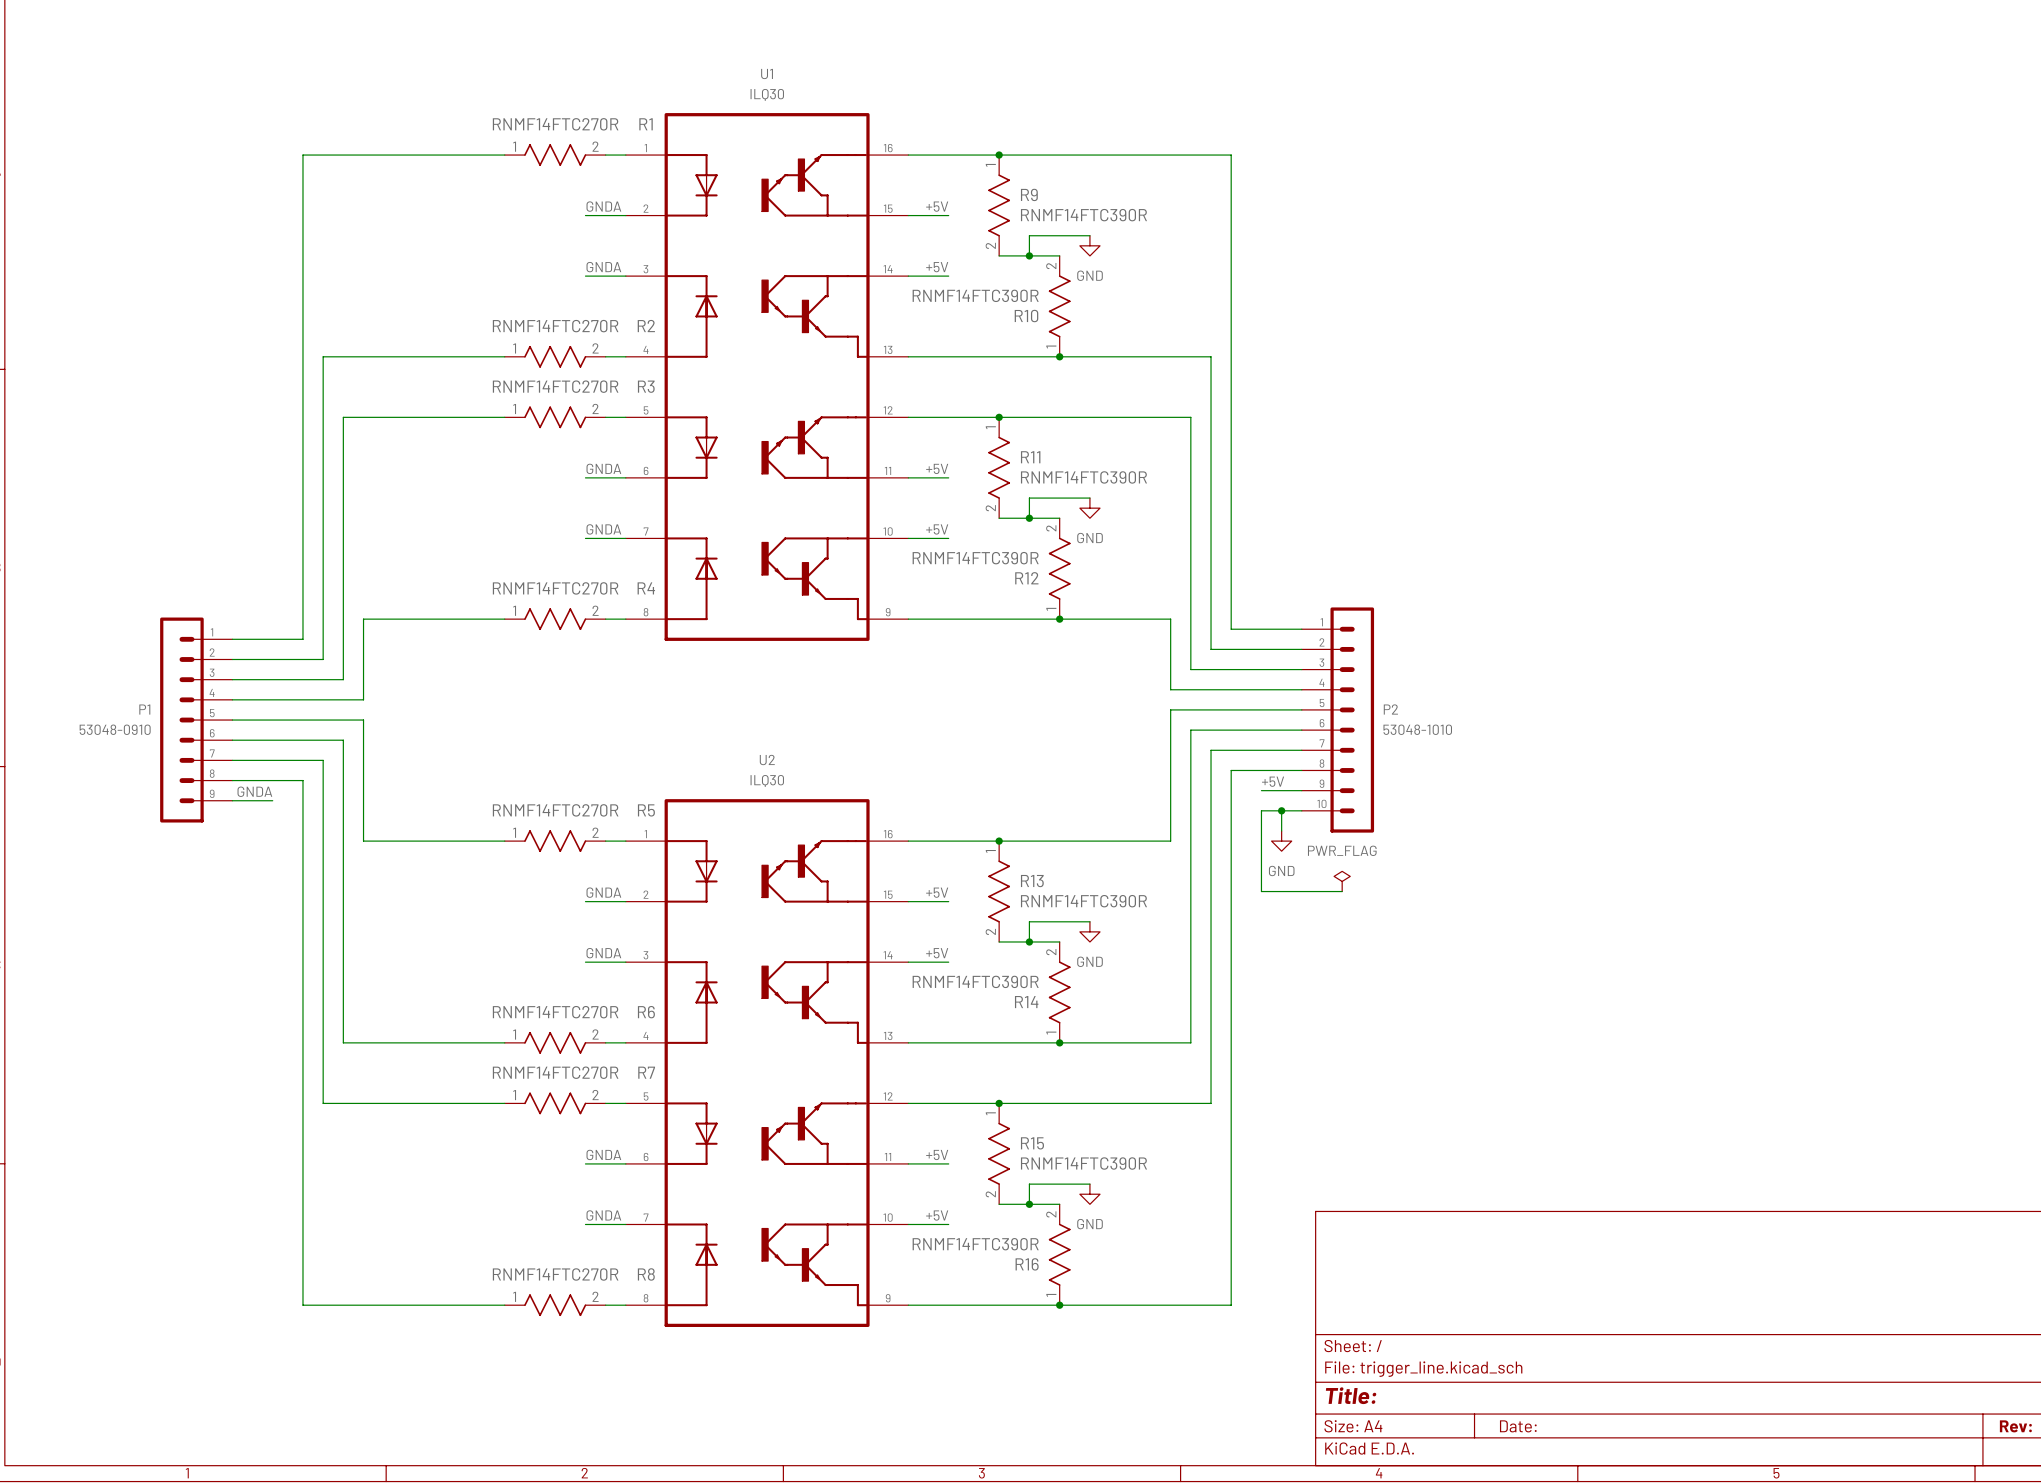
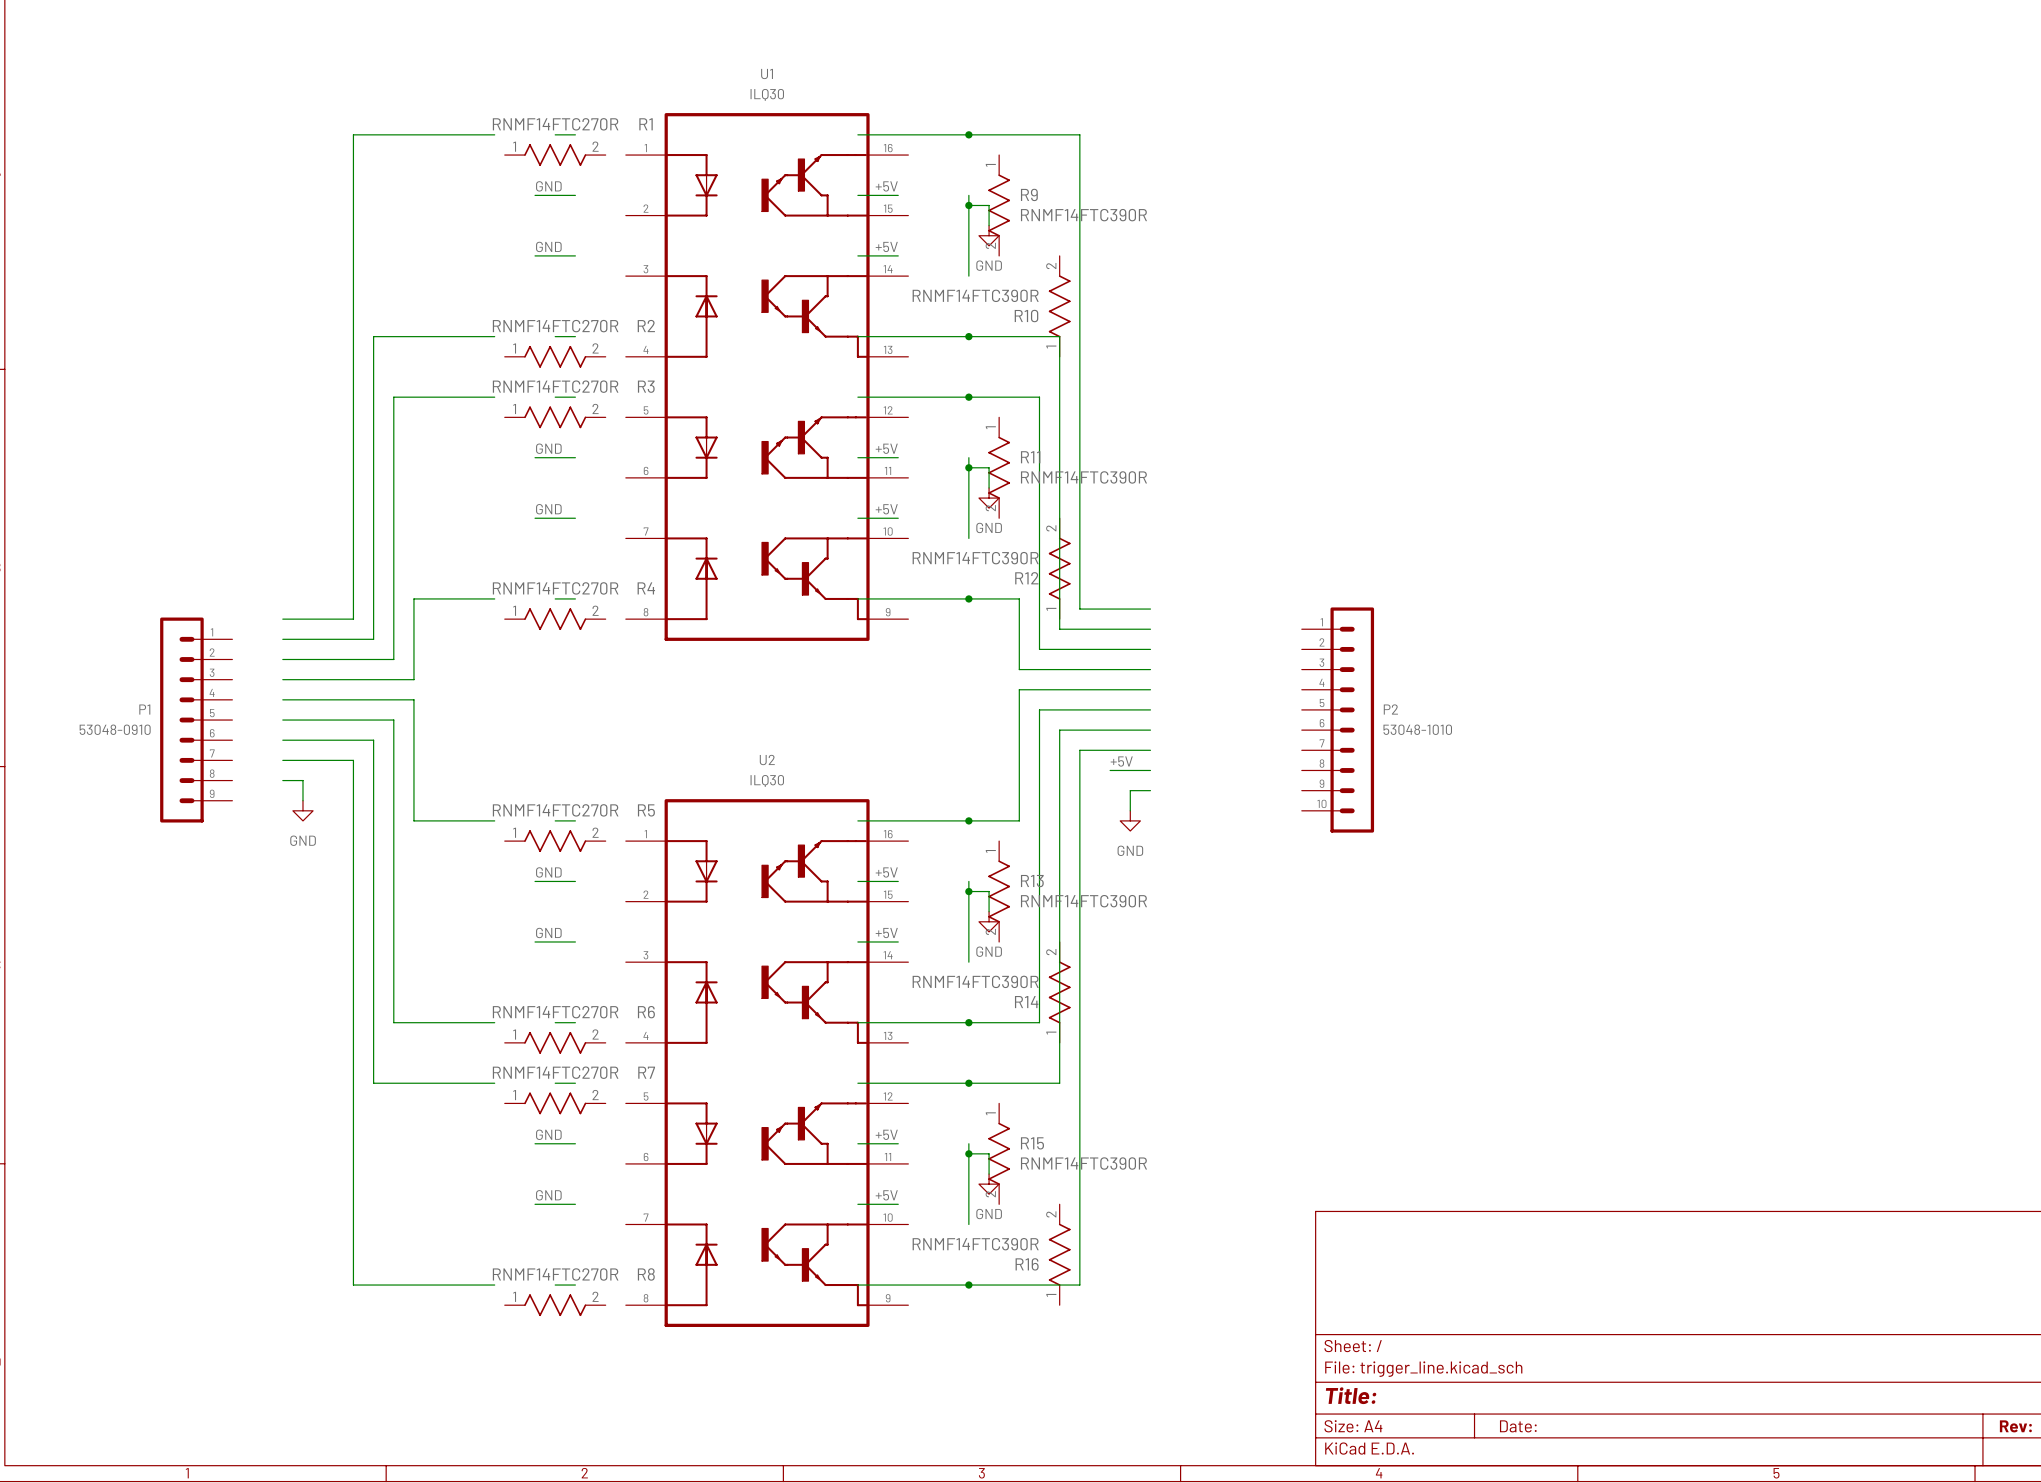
wire: none -> (494, 134) (353, 134) (353, 619) (282, 619)
wire: none -> (857, 134) (1079, 134) (1079, 609) (1150, 609)
junction: none -> (968, 134)
wire: (504, 155) (302, 155) (302, 639) -> (494, 336) (373, 336) (373, 639) (302, 639)
wire: (605, 155) (625, 155) -> (555, 134) (575, 134)
wire: (908, 155) (1231, 155) (1231, 629) (1301, 629) -> none
junction: (999, 155) -> none
label: none -> GND (548, 186)
label: none -> +5V (886, 186)
wire: none -> (968, 195) (968, 276)
wire: none -> (968, 205) (989, 205) (989, 225)
junction: none -> (968, 205)
label: GNDA (603, 206) -> none
label: +5V (937, 206) -> none
wire: (585, 215) (625, 215) -> (535, 195) (575, 195)
wire: (908, 215) (948, 215) -> (857, 195) (898, 195)
wire: (1089, 235) (1029, 235) (1029, 255) -> none
power symbol position: GND (1089, 245) -> GND (989, 235)
label: none -> GND (548, 246)
label: none -> +5V (886, 246)
wire: (999, 255) (1059, 255) -> none
junction: (1029, 255) -> none
label: GNDA (603, 267) -> none
label: +5V (937, 267) -> none
wire: (585, 276) (625, 276) -> (535, 255) (575, 255)
wire: (908, 276) (948, 276) -> (857, 255) (898, 255)
wire: none -> (857, 336) (1059, 336) (1059, 629) (1150, 629)
junction: none -> (968, 336)
wire: (504, 356) (323, 356) (323, 659) -> (494, 397) (393, 397) (393, 659) (323, 659)
wire: (605, 356) (625, 356) -> (555, 336) (575, 336)
wire: (908, 356) (1211, 356) (1211, 649) (1301, 649) -> none
junction: (1059, 356) -> none
wire: none -> (857, 397) (1039, 397) (1039, 649) (1150, 649)
junction: none -> (968, 397)
wire: (504, 417) (343, 417) (343, 679) -> (494, 598) (413, 598) (413, 679) (343, 679)
wire: (605, 417) (625, 417) -> (555, 397) (575, 397)
wire: (908, 417) (1190, 417) (1190, 669) (1301, 669) -> none
junction: (999, 417) -> none
label: none -> GND (548, 448)
label: none -> +5V (886, 448)
wire: none -> (968, 457) (968, 538)
wire: none -> (968, 467) (989, 467) (989, 487)
junction: none -> (968, 467)
label: GNDA (603, 468) -> none
label: +5V (937, 468) -> none
wire: (585, 477) (625, 477) -> (535, 457) (575, 457)
wire: (908, 477) (948, 477) -> (857, 457) (898, 457)
wire: (1089, 498) (1029, 498) (1029, 518) -> none
power symbol position: GND (1089, 508) -> GND (989, 498)
label: none -> GND (548, 509)
label: none -> +5V (886, 509)
wire: (999, 518) (1059, 518) -> none
junction: (1029, 518) -> none
label: GNDA (603, 529) -> none
label: +5V (937, 529) -> none
wire: (585, 538) (625, 538) -> (535, 518) (575, 518)
wire: (908, 538) (948, 538) -> (857, 518) (898, 518)
wire: none -> (857, 598) (1019, 598) (1019, 669) (1150, 669)
junction: none -> (968, 598)
wire: (504, 619) (363, 619) (363, 699) -> (494, 820) (413, 820) (413, 699) (363, 699)
wire: (605, 619) (625, 619) -> (555, 598) (575, 598)
wire: (908, 619) (1170, 619) (1170, 689) (1301, 689) -> none
junction: (1059, 619) -> none
wire: (232, 639) (282, 639) -> none
wire: (232, 659) (282, 659) -> none
wire: (232, 679) (282, 679) -> none
wire: none -> (1150, 689) (1019, 689) (1019, 820) (857, 820)
wire: (232, 699) (282, 699) -> none
wire: none -> (1150, 709) (1039, 709) (1039, 1022) (857, 1022)
wire: (1301, 709) (1170, 709) (1170, 841) (908, 841) -> none
wire: (232, 720) (282, 720) -> none
wire: (363, 720) (363, 841) (504, 841) -> (363, 720) (393, 720) (393, 1022) (494, 1022)
wire: none -> (1150, 730) (1059, 730) (1059, 1083) (857, 1083)
wire: (1301, 730) (1190, 730) (1190, 1042) (908, 1042) -> none
wire: (232, 740) (282, 740) -> none
wire: (343, 740) (343, 1042) (504, 1042) -> (343, 740) (373, 740) (373, 1083) (494, 1083)
wire: none -> (1150, 750) (1079, 750) (1079, 1285) (857, 1285)
wire: (1301, 750) (1211, 750) (1211, 1103) (908, 1103) -> none
wire: (232, 760) (282, 760) -> none
wire: (323, 760) (323, 1103) (504, 1103) -> (323, 760) (353, 760) (353, 1285) (494, 1285)
label: none -> +5V (1121, 761)
wire: (1301, 770) (1231, 770) (1231, 1305) (908, 1305) -> none
wire: (232, 780) (282, 780) -> none
label: +5V (1273, 781) -> none
wire: none -> (1150, 790) (1130, 790) (1130, 810)
wire: (1261, 790) (1301, 790) -> (1110, 770) (1150, 770)
label: GNDA (254, 791) -> none
wire: (232, 800) (272, 800) -> none
wire: (302, 800) (302, 1305) (504, 1305) -> none
power symbol: none -> GND (302, 810)
wire: (1281, 810) (1281, 831) -> none
junction: (1281, 810) -> none
wire: (1301, 810) (1261, 810) (1261, 891) (1342, 891) -> none
junction: none -> (968, 820)
power symbol: none -> GND (1130, 820)
wire: (605, 841) (625, 841) -> (555, 820) (575, 820)
junction: (999, 841) -> none
power symbol: GND (1281, 841) -> none
label: none -> GND (548, 872)
label: none -> +5V (886, 872)
wire: none -> (968, 881) (968, 962)
power symbol: PWR_FLAG (1342, 881) -> none
wire: none -> (968, 891) (989, 891) (989, 911)
junction: none -> (968, 891)
label: GNDA (603, 892) -> none
label: +5V (937, 892) -> none
wire: (585, 901) (625, 901) -> (535, 881) (575, 881)
wire: (908, 901) (948, 901) -> (857, 881) (898, 881)
power symbol: none -> GND (989, 921)
wire: (1089, 921) (1029, 921) (1029, 941) -> none
power symbol: GND (1089, 931) -> none
label: none -> GND (548, 932)
label: none -> +5V (886, 933)
wire: (999, 941) (1059, 941) -> none
junction: (1029, 941) -> none
label: GNDA (603, 953) -> none
label: +5V (937, 953) -> none
wire: (585, 962) (625, 962) -> (535, 941) (575, 941)
wire: (908, 962) (948, 962) -> (857, 941) (898, 941)
junction: none -> (968, 1022)
wire: (605, 1042) (625, 1042) -> (555, 1022) (575, 1022)
junction: (1059, 1042) -> none
junction: none -> (968, 1083)
wire: (605, 1103) (625, 1103) -> (555, 1083) (575, 1083)
junction: (999, 1103) -> none
label: none -> GND (548, 1134)
label: none -> +5V (886, 1134)
wire: none -> (968, 1143) (968, 1224)
wire: none -> (968, 1153) (989, 1153) (989, 1174)
junction: none -> (968, 1153)
label: GNDA (603, 1154) -> none
label: +5V (937, 1154) -> none
wire: (585, 1163) (625, 1163) -> (535, 1143) (575, 1143)
wire: (908, 1163) (948, 1163) -> (857, 1143) (898, 1143)
wire: (1089, 1184) (1029, 1184) (1029, 1204) -> none
power symbol position: GND (1089, 1194) -> GND (989, 1184)
label: none -> GND (548, 1195)
label: none -> +5V (886, 1195)
wire: (999, 1204) (1059, 1204) -> none
junction: (1029, 1204) -> none
label: GNDA (603, 1215) -> none
label: +5V (937, 1215) -> none
wire: (585, 1224) (625, 1224) -> (535, 1204) (575, 1204)
wire: (908, 1224) (948, 1224) -> (857, 1204) (898, 1204)
junction: none -> (968, 1285)
wire: (605, 1305) (625, 1305) -> (555, 1285) (575, 1285)
junction: (1059, 1305) -> none

